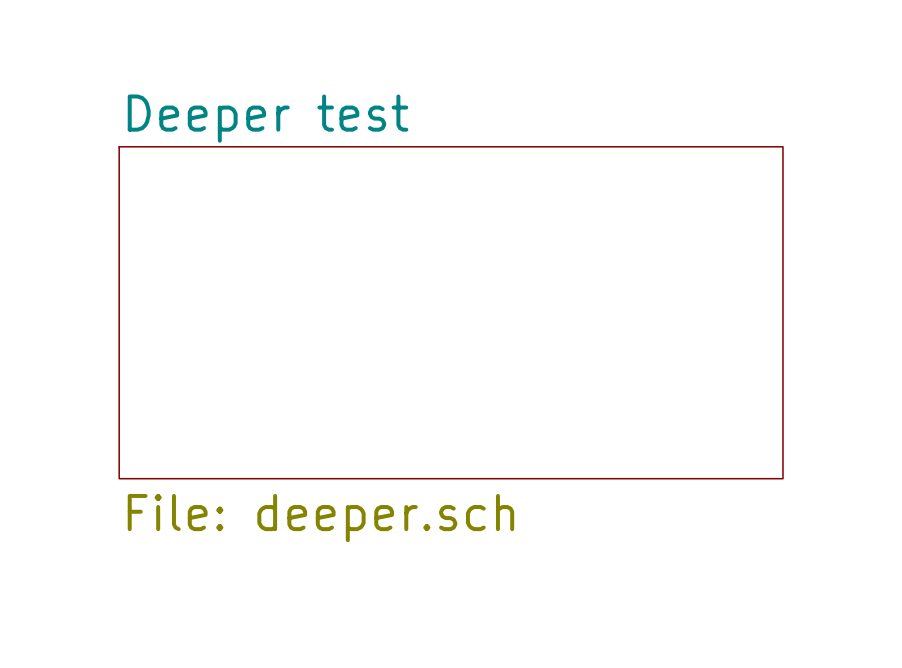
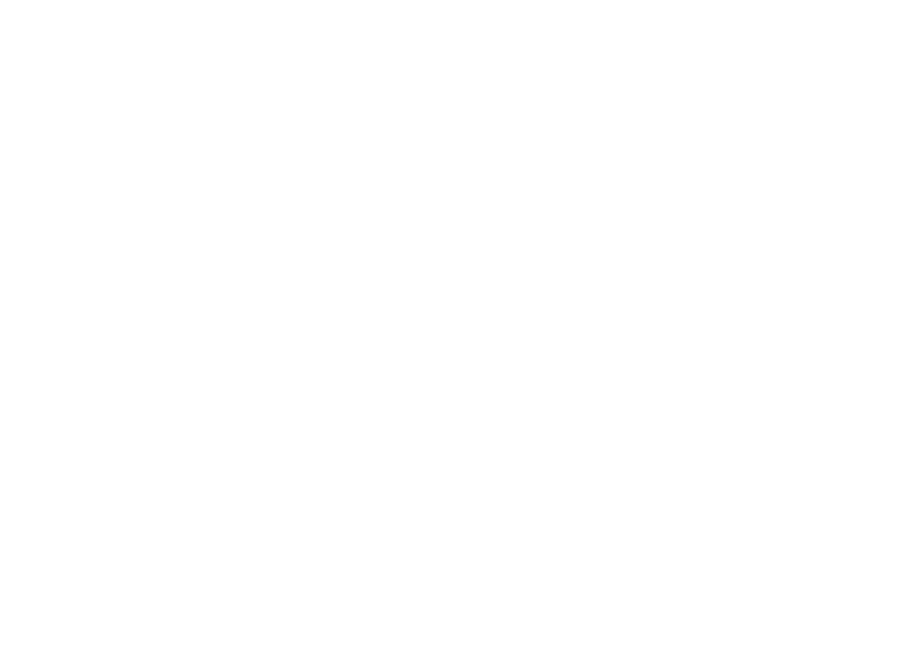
sheet Deeper test: File: deeper.sch (451, 312) -> none

